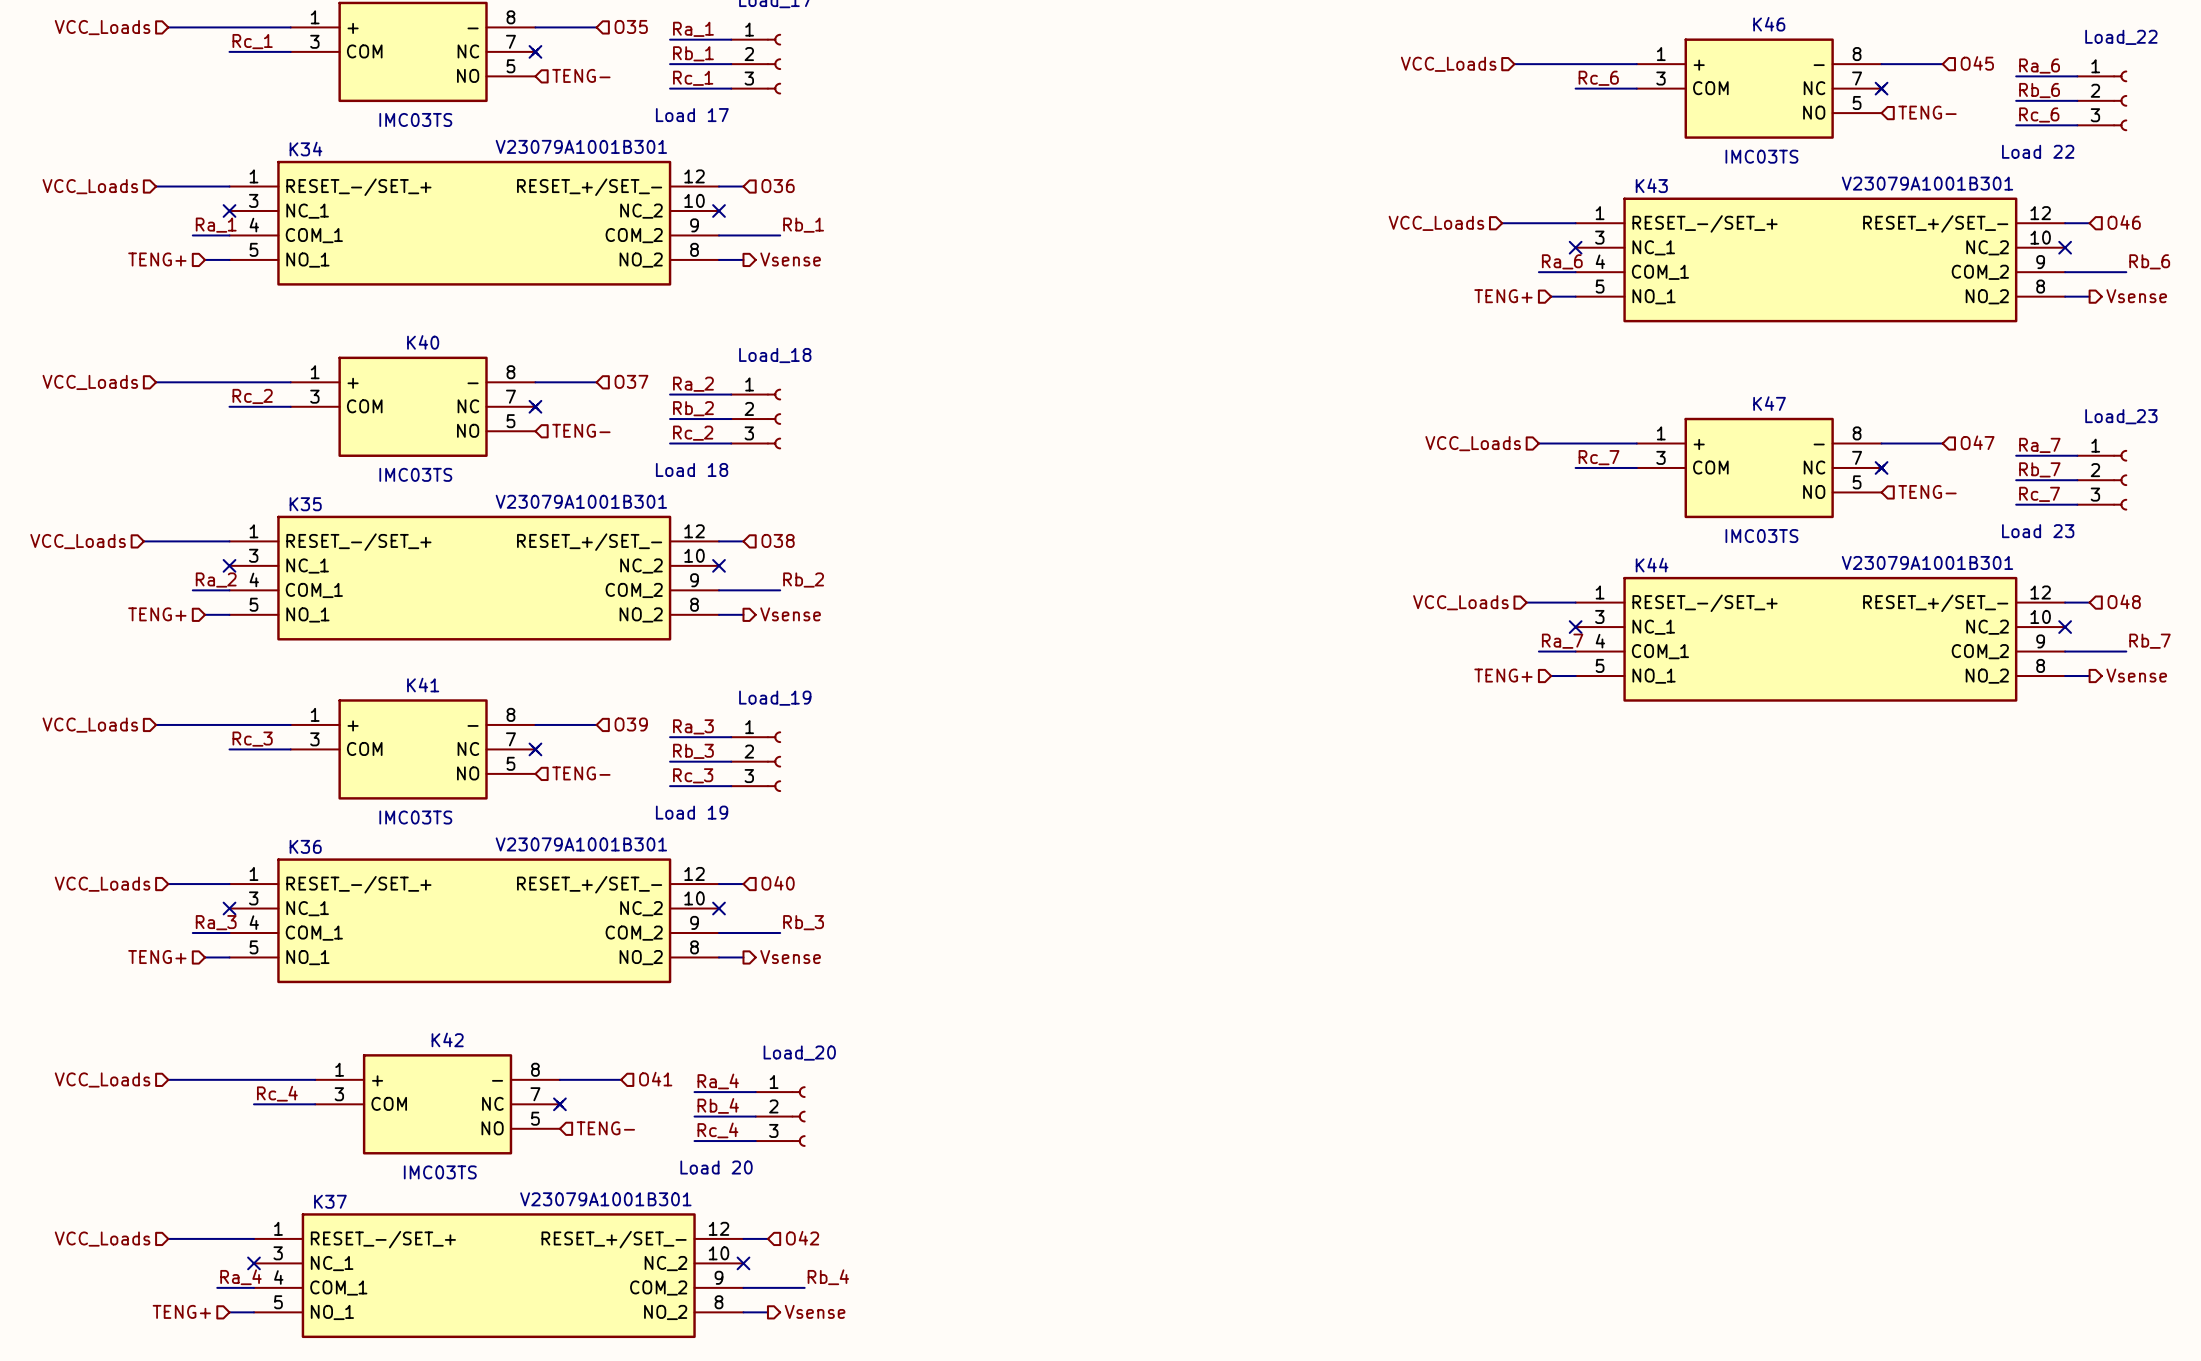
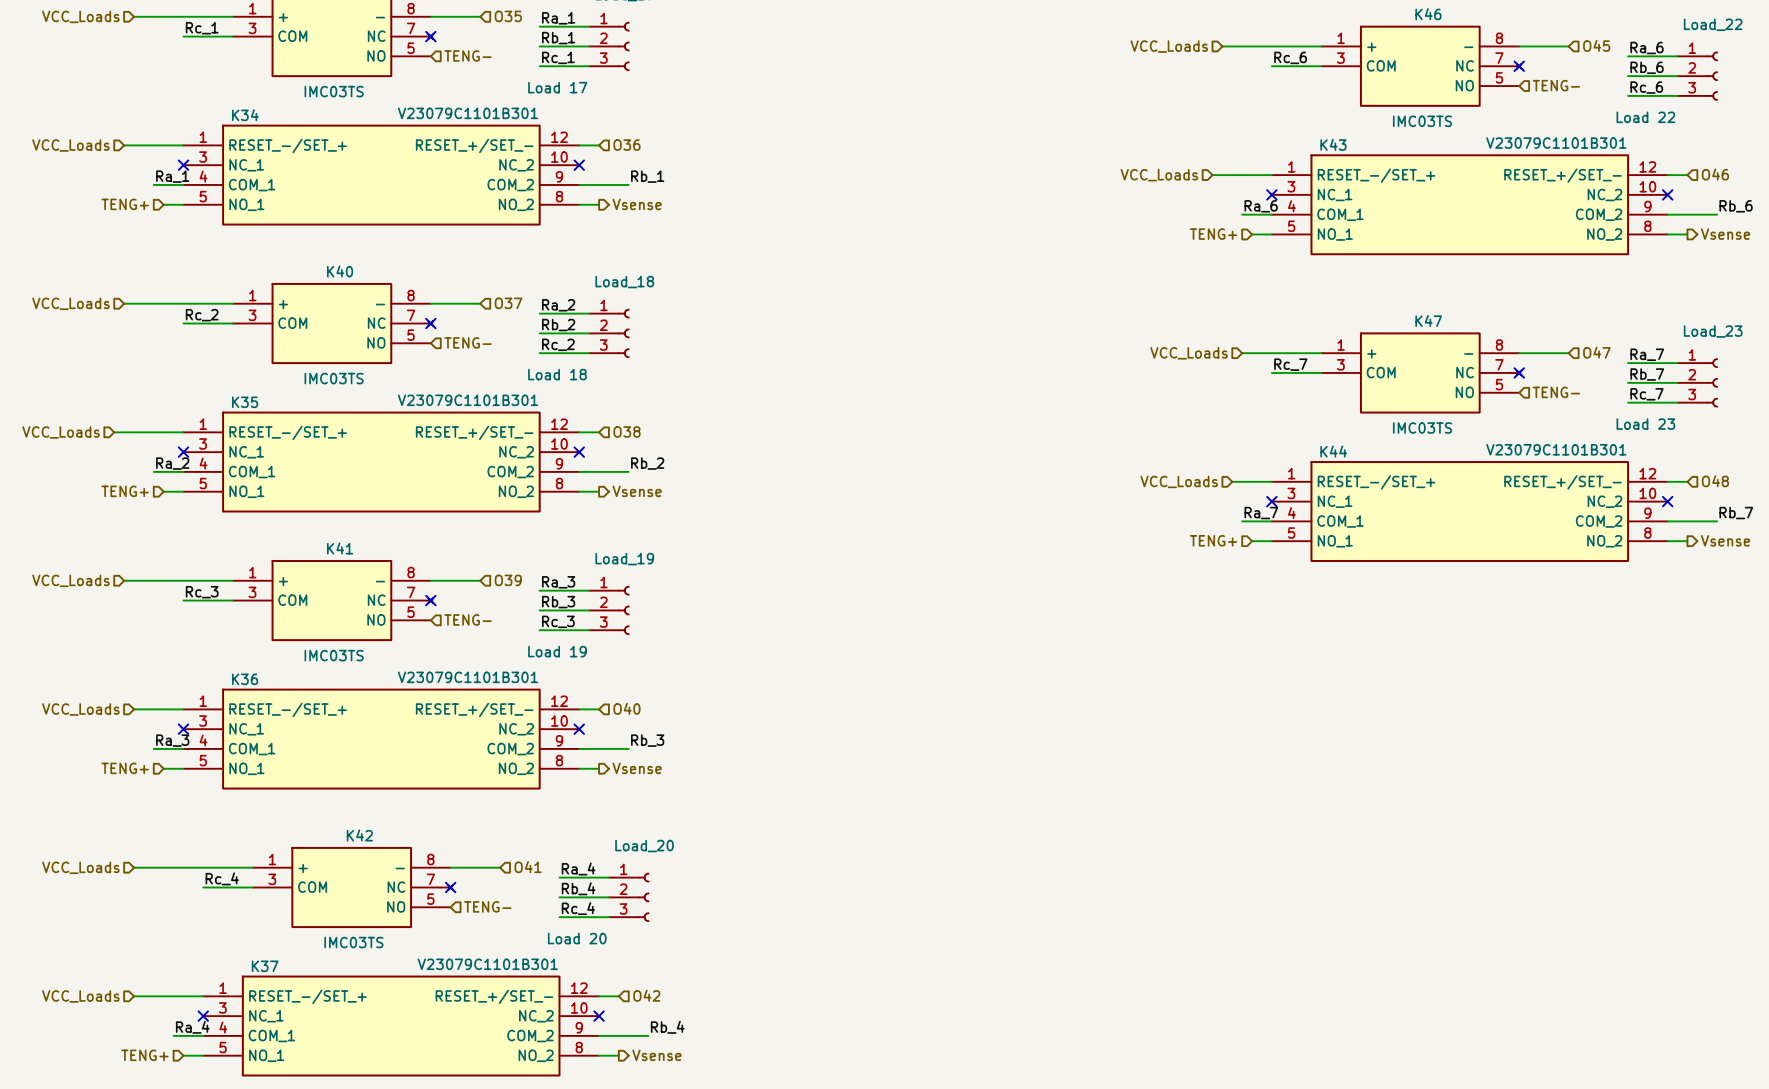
K34 value: V23079A1001B301 (581, 146) -> V23079C1101B301 (467, 113)
K43 value: V23079A1001B301 (1927, 183) -> V23079C1101B301 (1556, 143)
K35 value: V23079A1001B301 (581, 501) -> V23079C1101B301 (467, 400)
K44 value: V23079A1001B301 (1927, 562) -> V23079C1101B301 (1556, 449)
K36 value: V23079A1001B301 (581, 844) -> V23079C1101B301 (467, 677)
K37 value: V23079A1001B301 (605, 1199) -> V23079C1101B301 (487, 964)

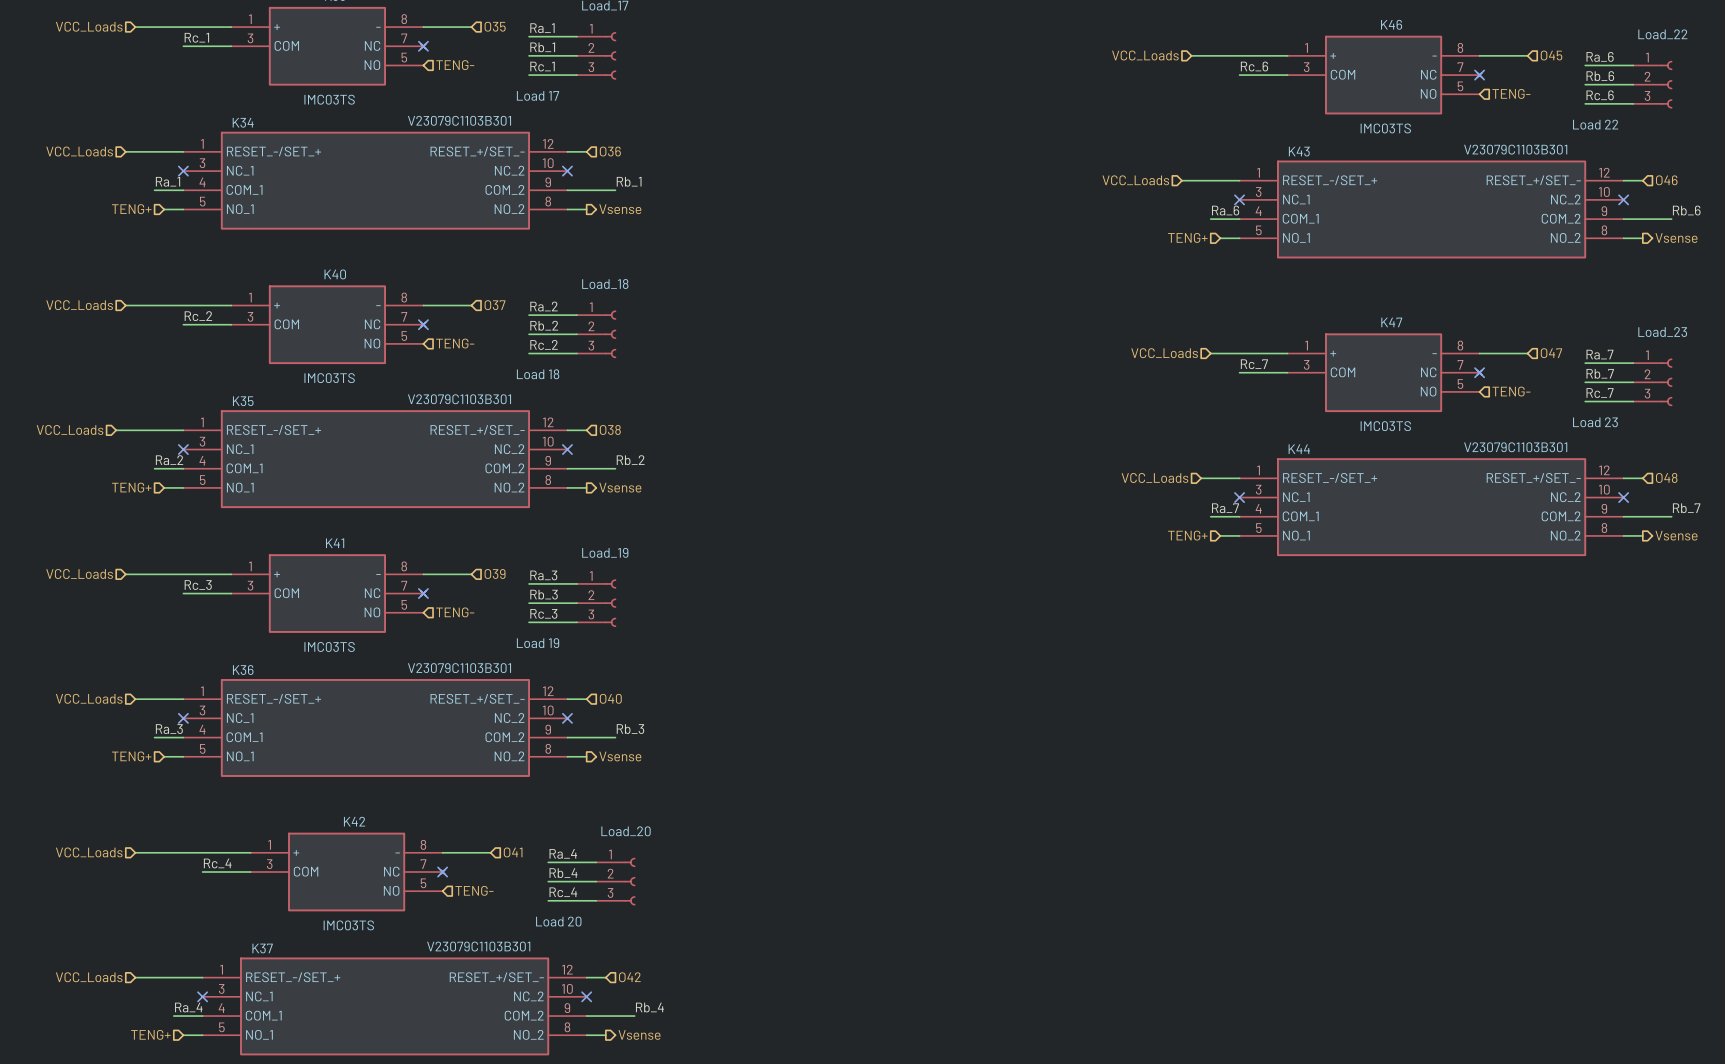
K34 value: V23079C1101B301 (467, 113) -> V23079C1103B301 (459, 120)
K43 value: V23079C1101B301 (1556, 143) -> V23079C1103B301 (1515, 149)
K35 value: V23079C1101B301 (467, 400) -> V23079C1103B301 (459, 399)
K44 value: V23079C1101B301 (1556, 449) -> V23079C1103B301 (1515, 447)
K36 value: V23079C1101B301 (467, 677) -> V23079C1103B301 (459, 668)
K37 value: V23079C1101B301 (487, 964) -> V23079C1103B301 (478, 946)

